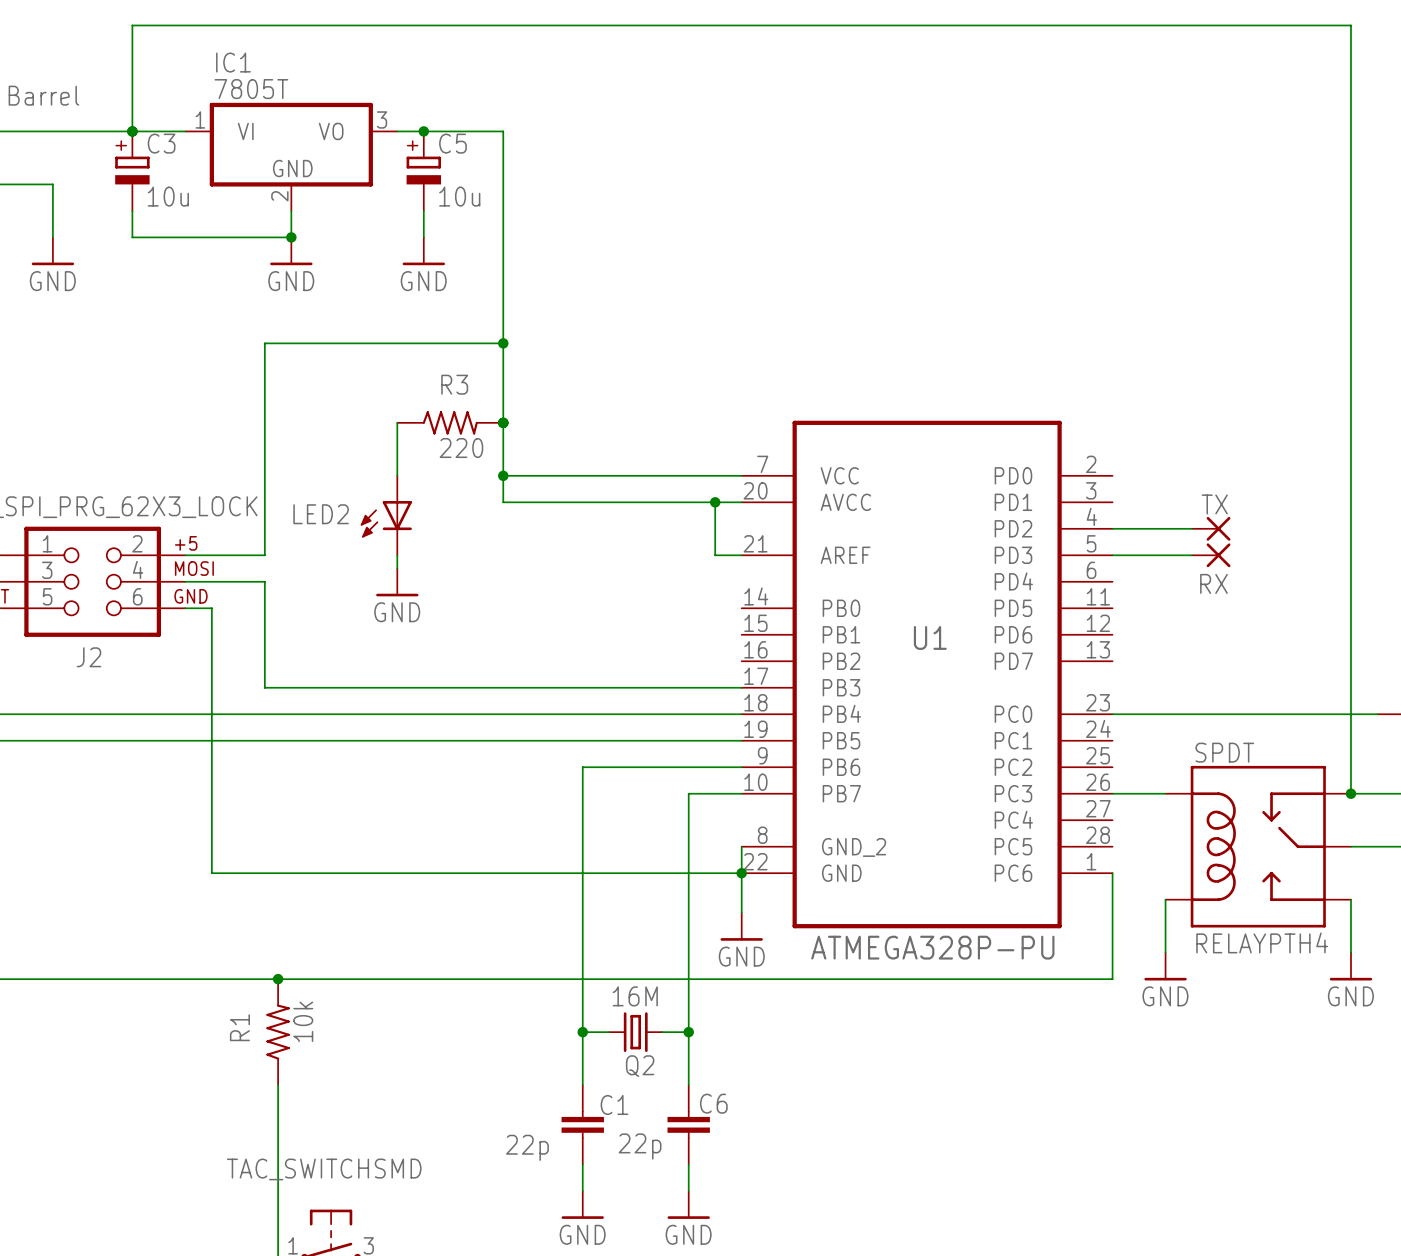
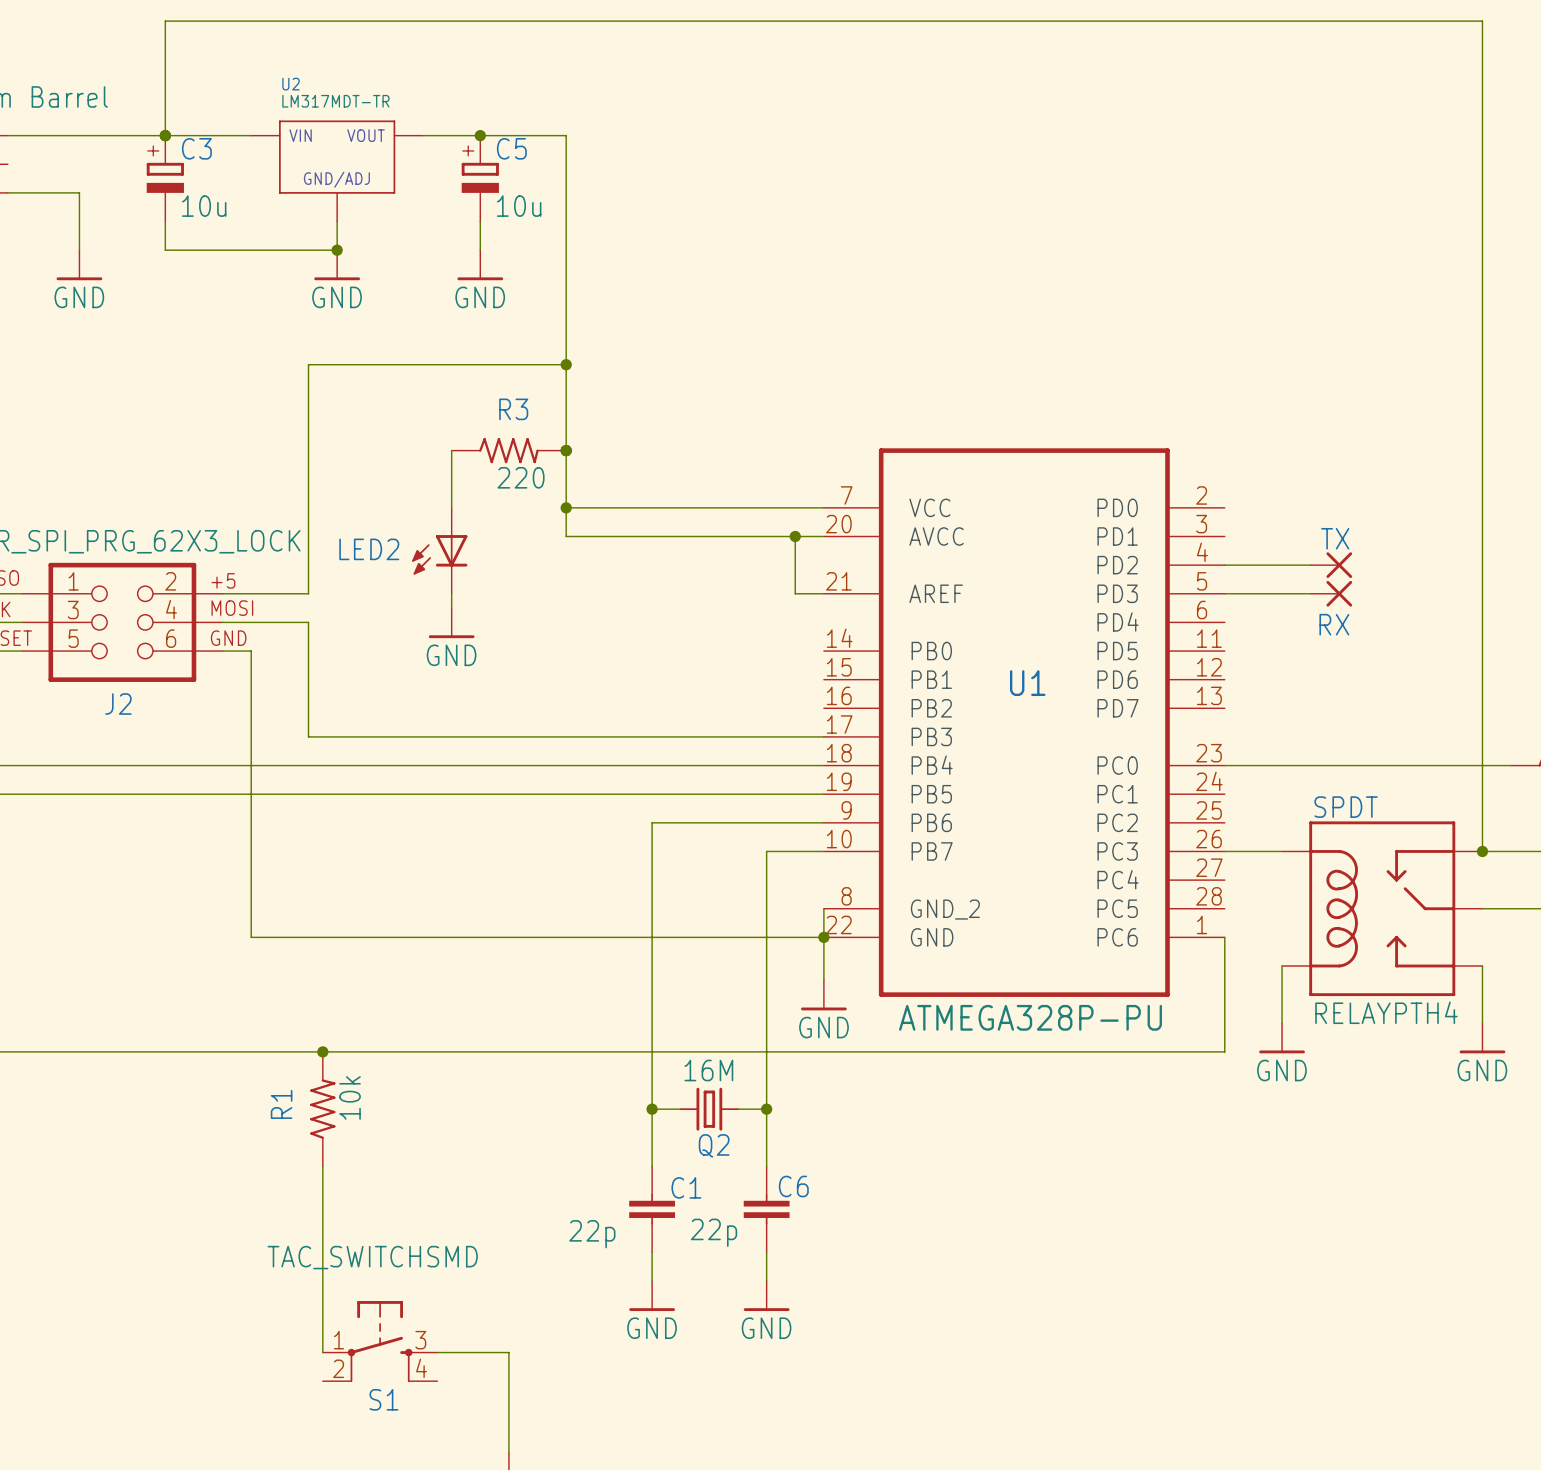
IC1: 7805T (291, 156) -> none
U2: none -> LM317MDT-TR (337, 171)

